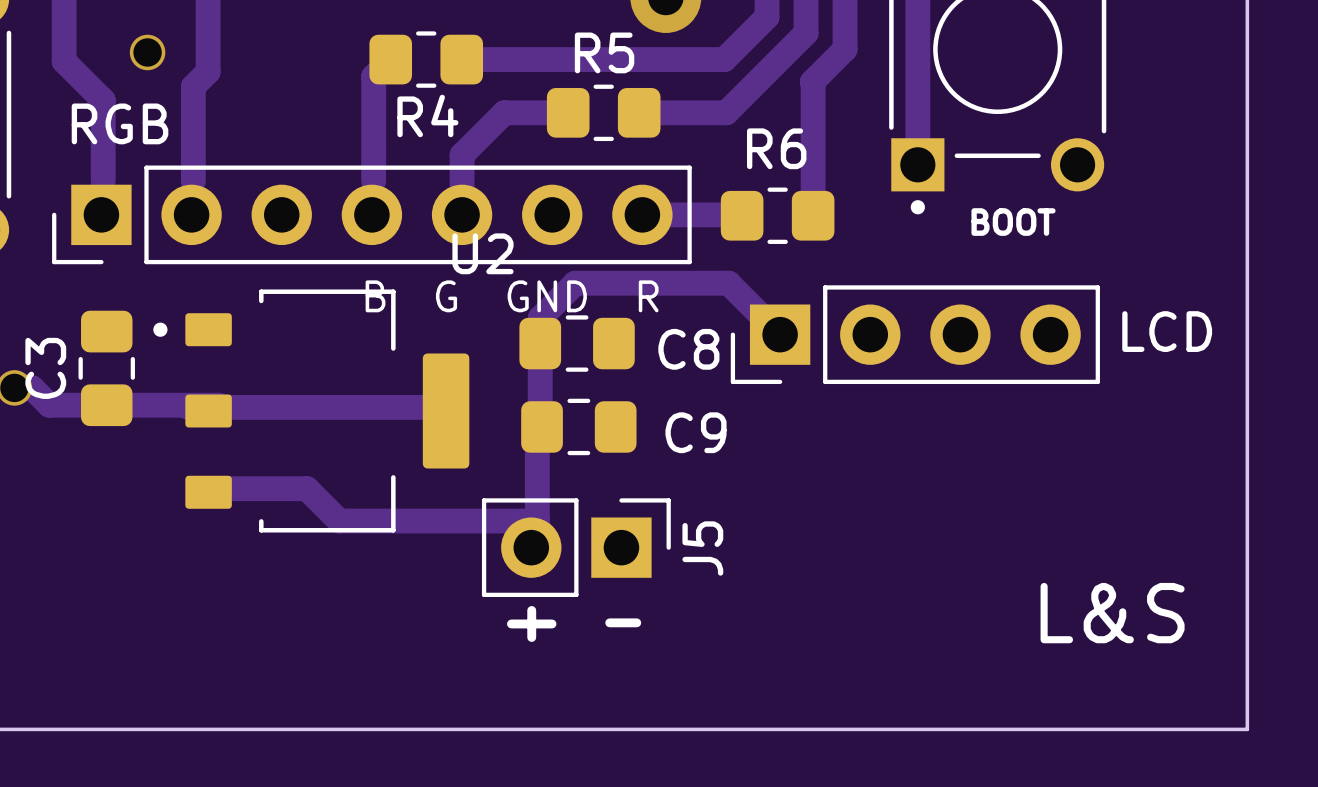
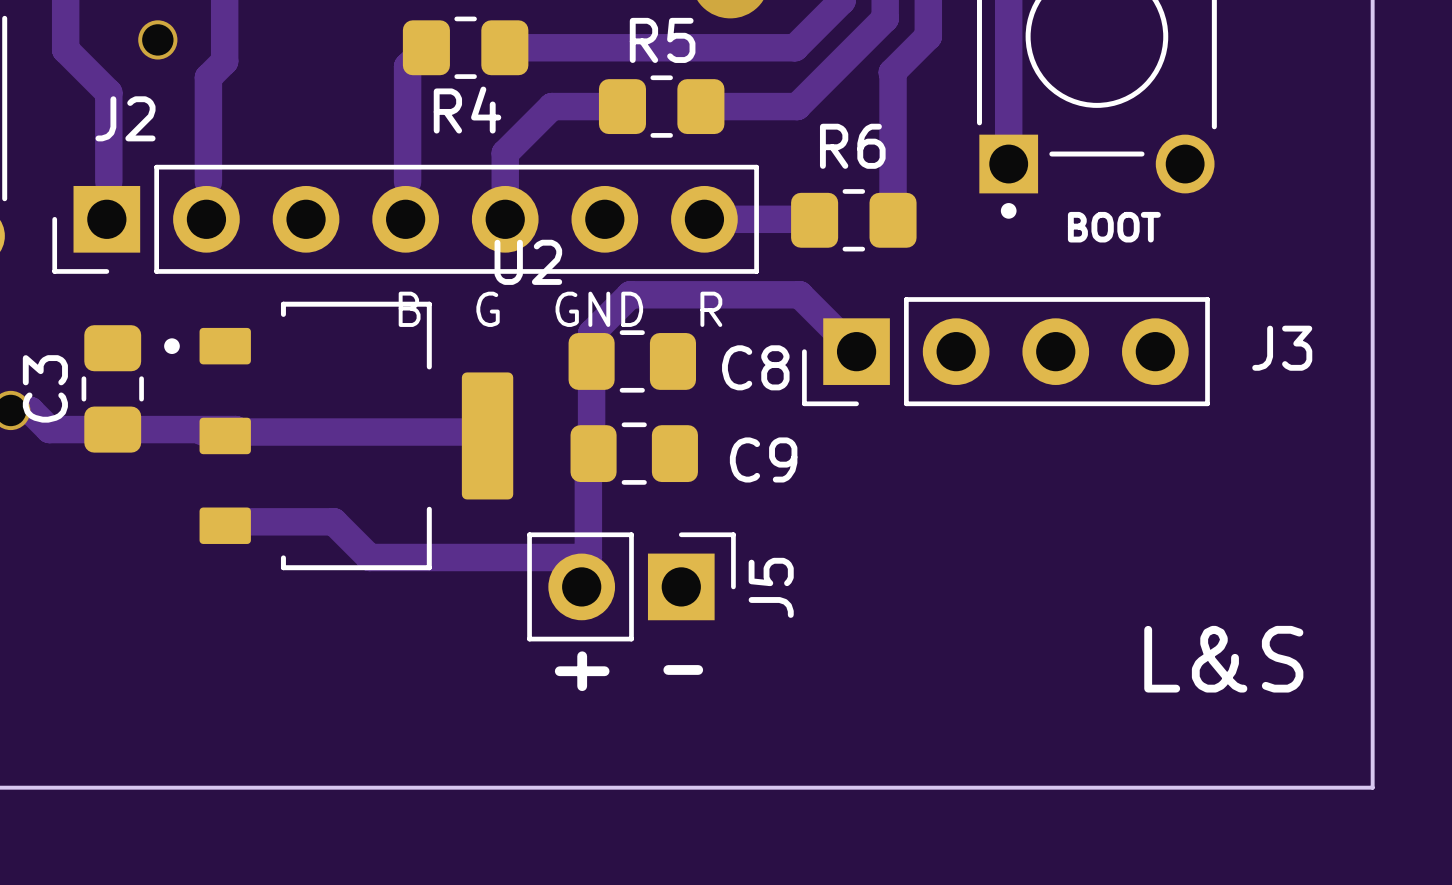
RGB name: RGB (120, 123) -> J2 (125, 118)
LCD name: LCD (1167, 331) -> J3 (1282, 348)

